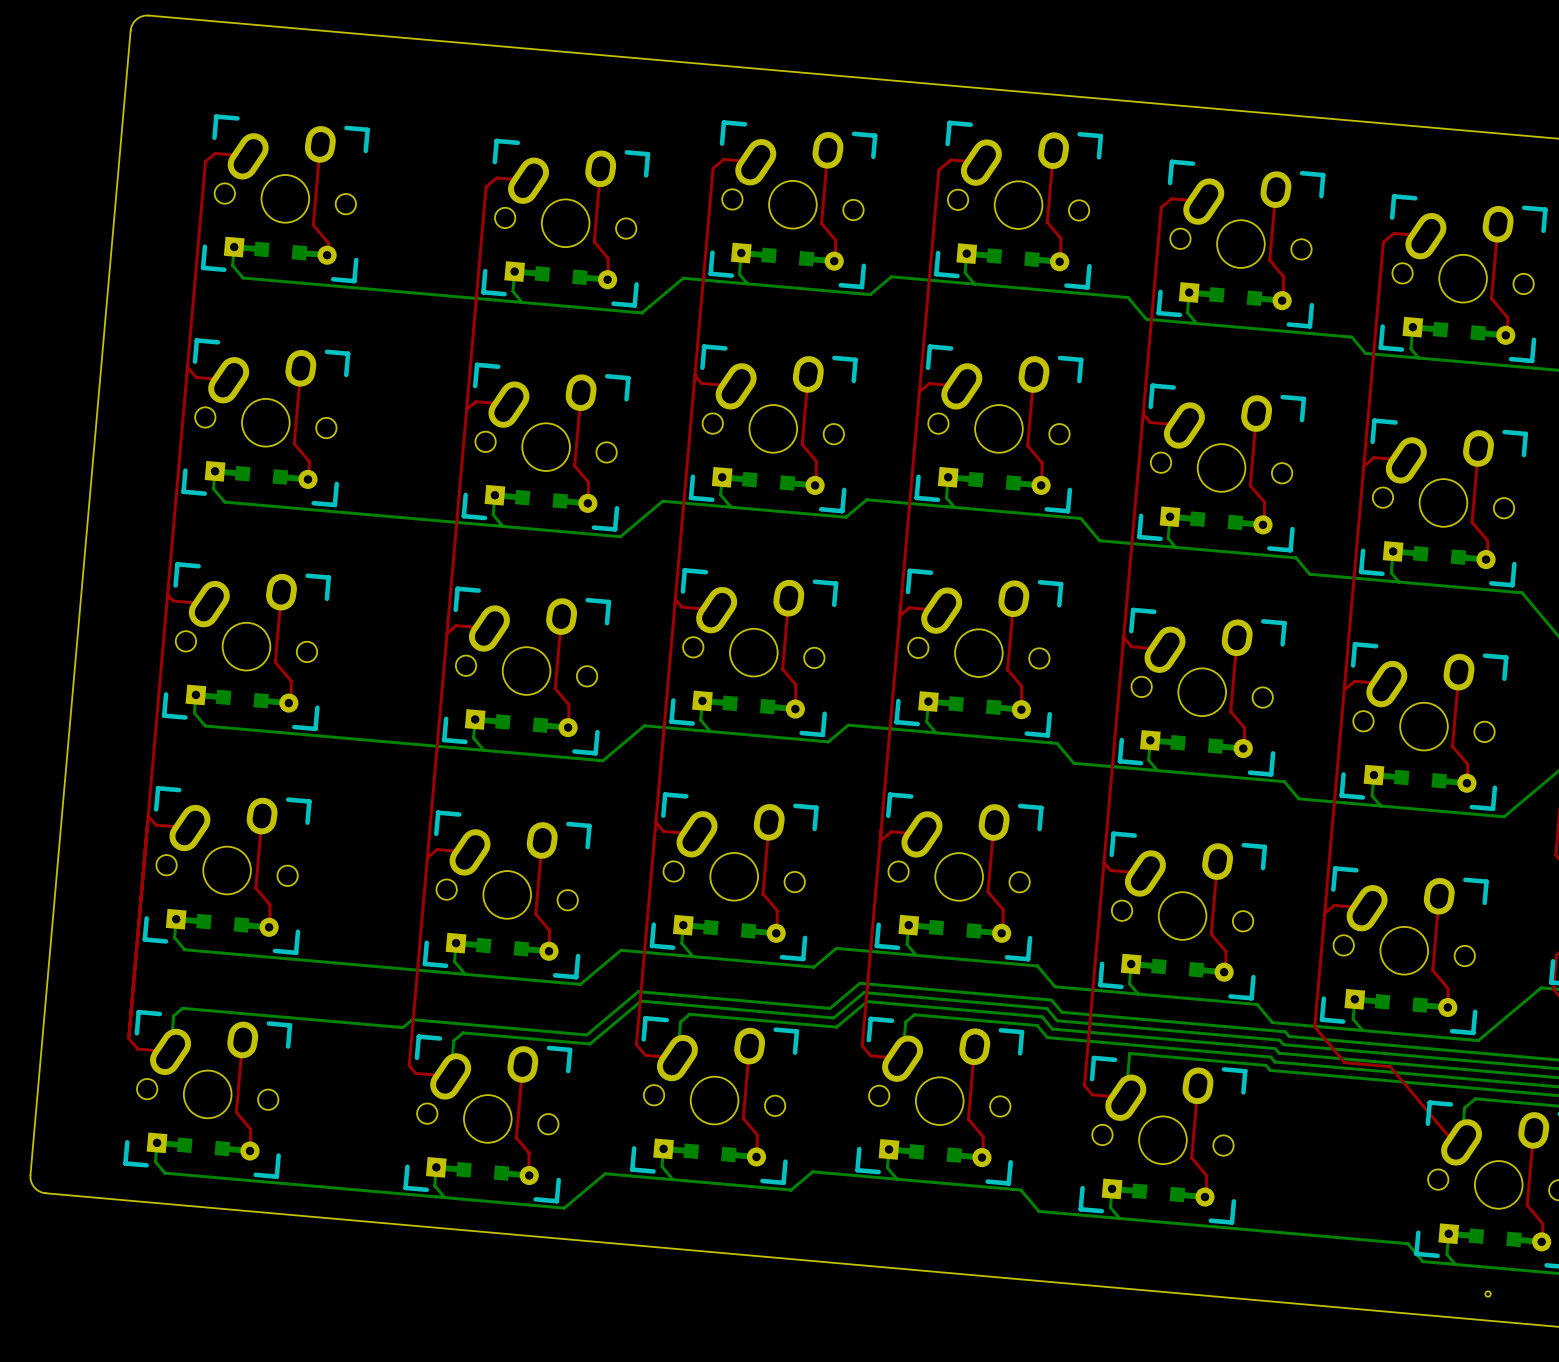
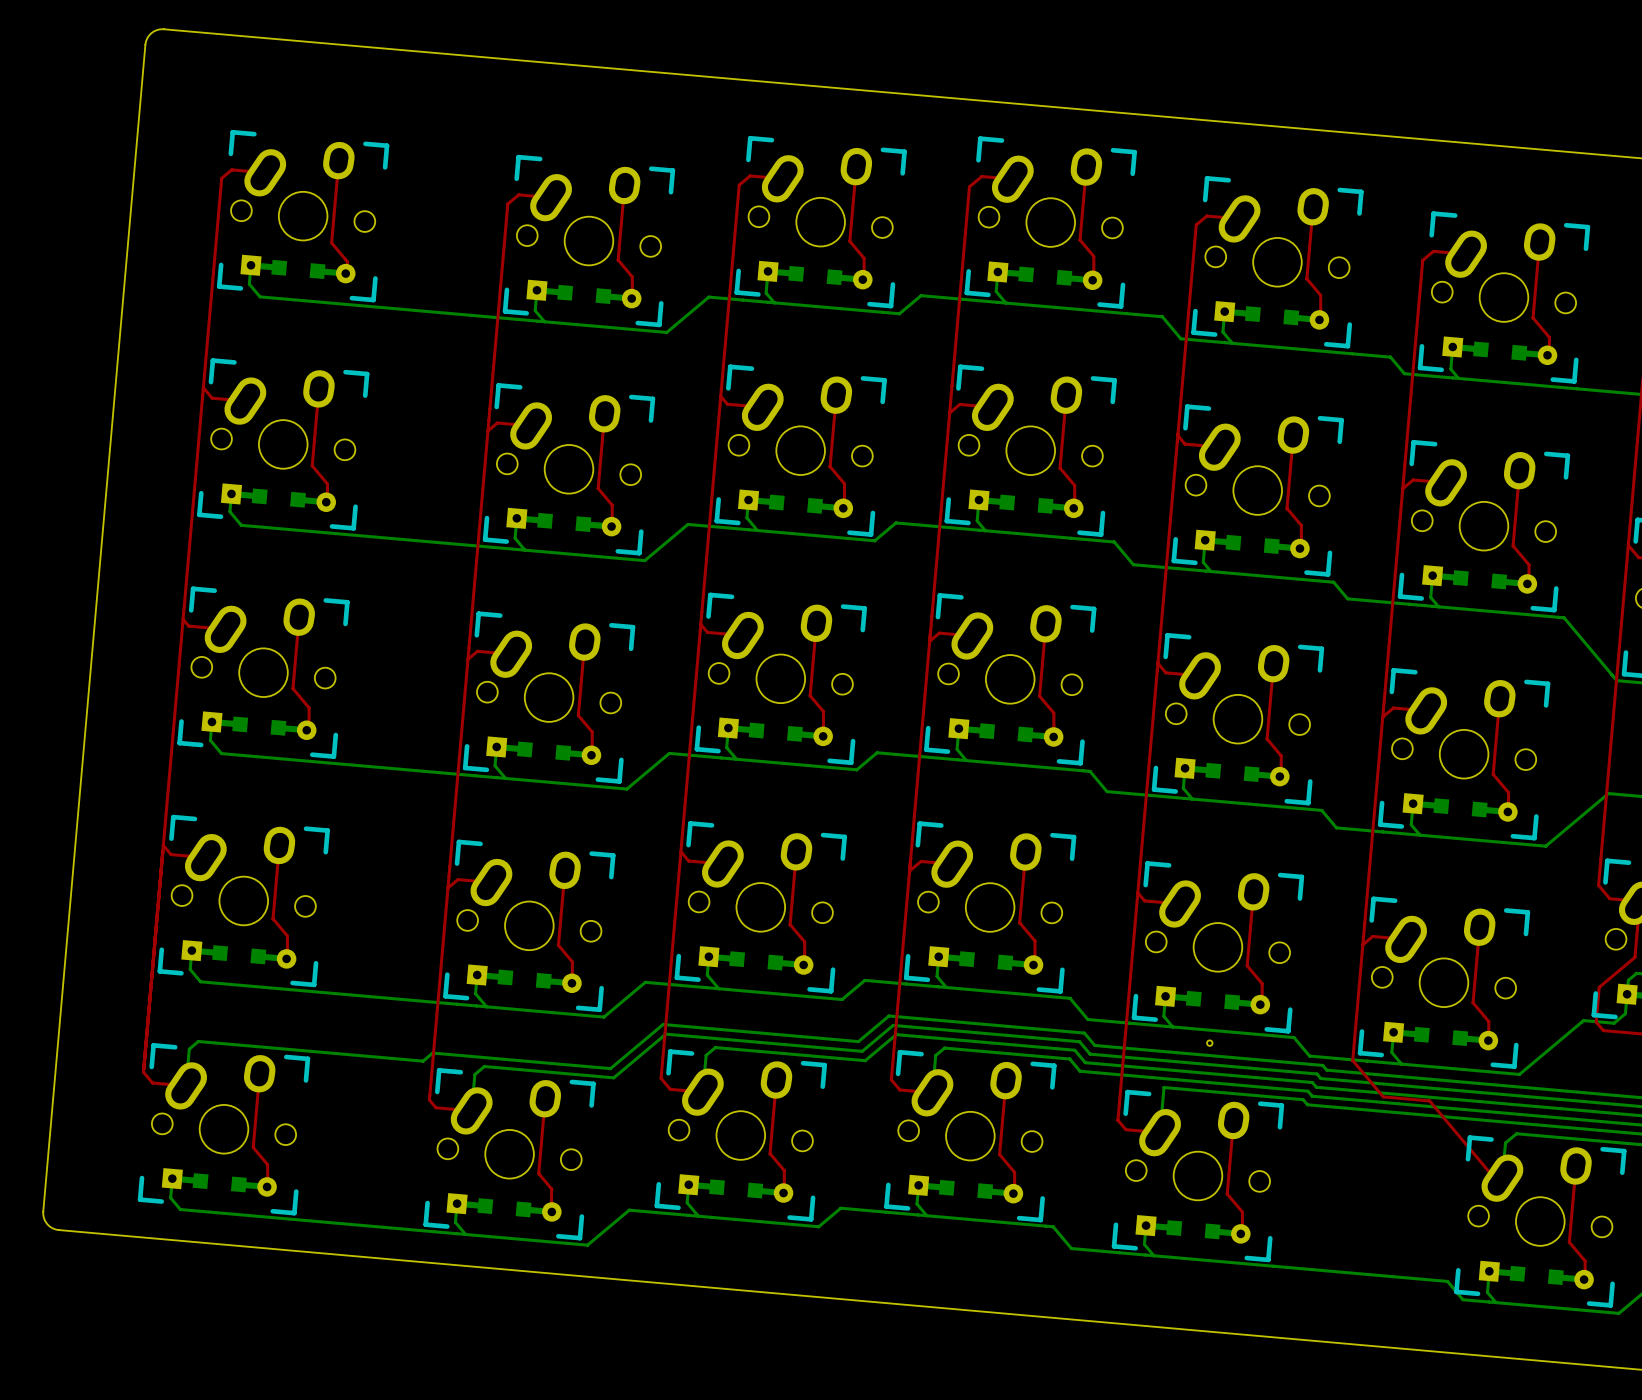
part: none -> (1209, 1043)
part: (1488, 1294) -> none

